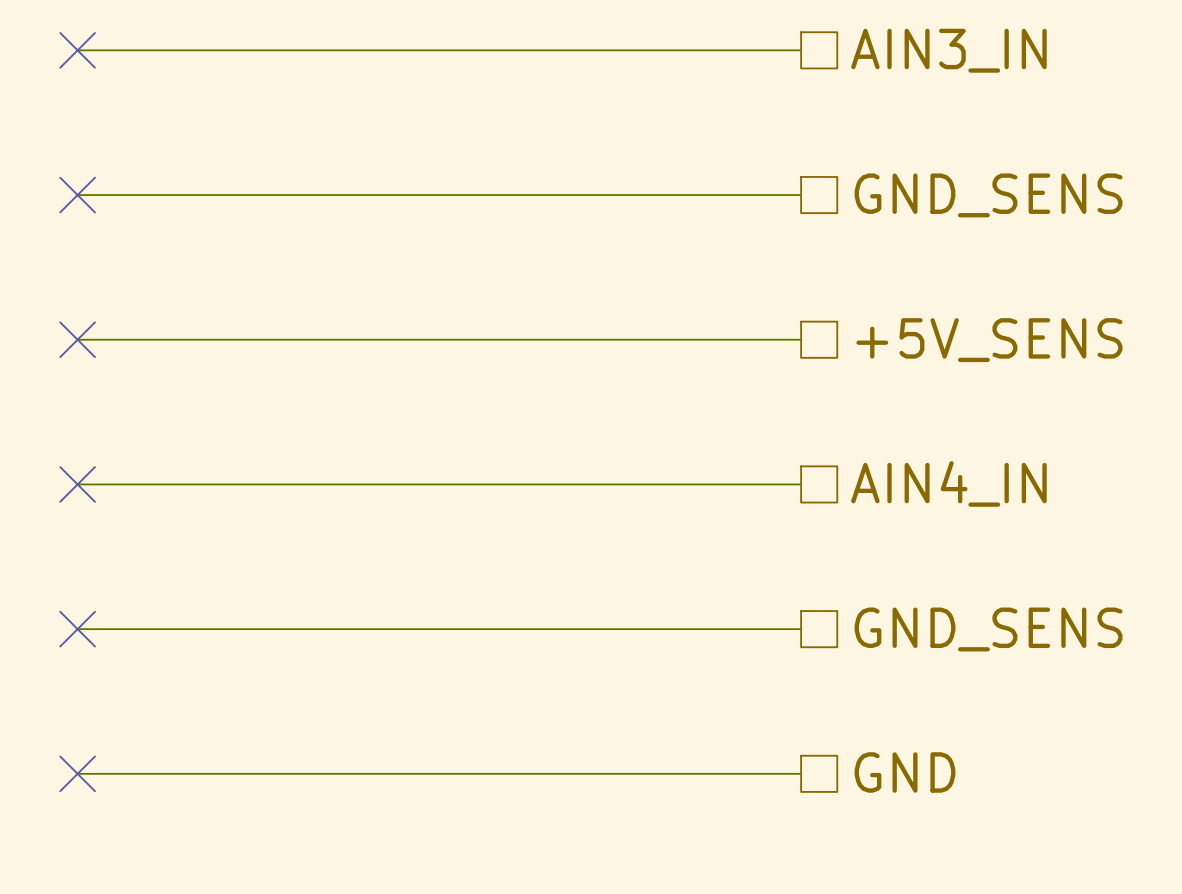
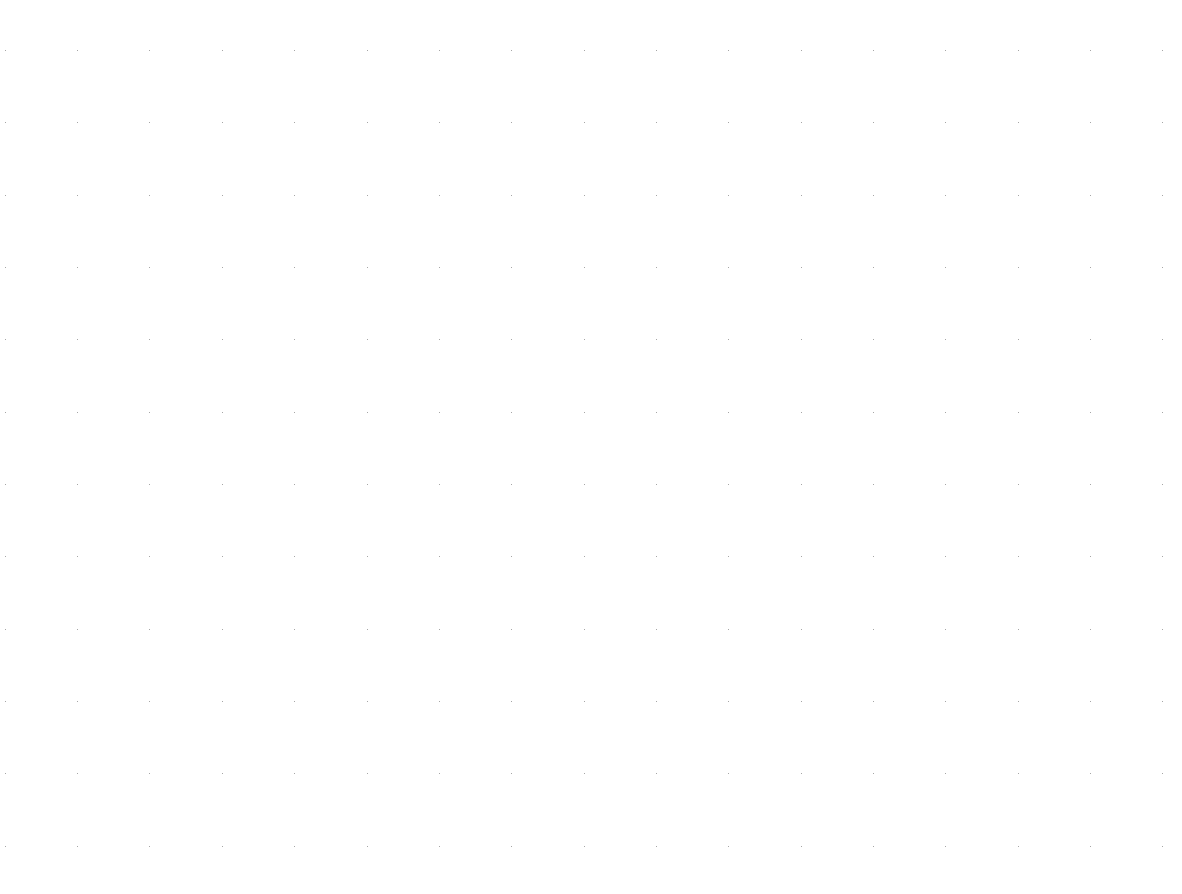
wire: (77, 50) (801, 50) -> none
no-connect mark: (77, 50) -> none
hierarchical label: AIN3_IN (948, 50) -> none
wire: (77, 195) (801, 195) -> none
no-connect mark: (77, 195) -> none
hierarchical label: GND_SENS (988, 195) -> none
wire: (77, 339) (801, 339) -> none
no-connect mark: (77, 339) -> none
hierarchical label: +5V_SENS (989, 340) -> none
hierarchical label: AIN4_IN (948, 483) -> none
wire: (77, 484) (801, 484) -> none
no-connect mark: (77, 484) -> none
wire: (77, 629) (801, 629) -> none
no-connect mark: (77, 629) -> none
hierarchical label: GND_SENS (988, 629) -> none
hierarchical label: GND (905, 772) -> none
wire: (77, 773) (801, 773) -> none
no-connect mark: (77, 773) -> none

